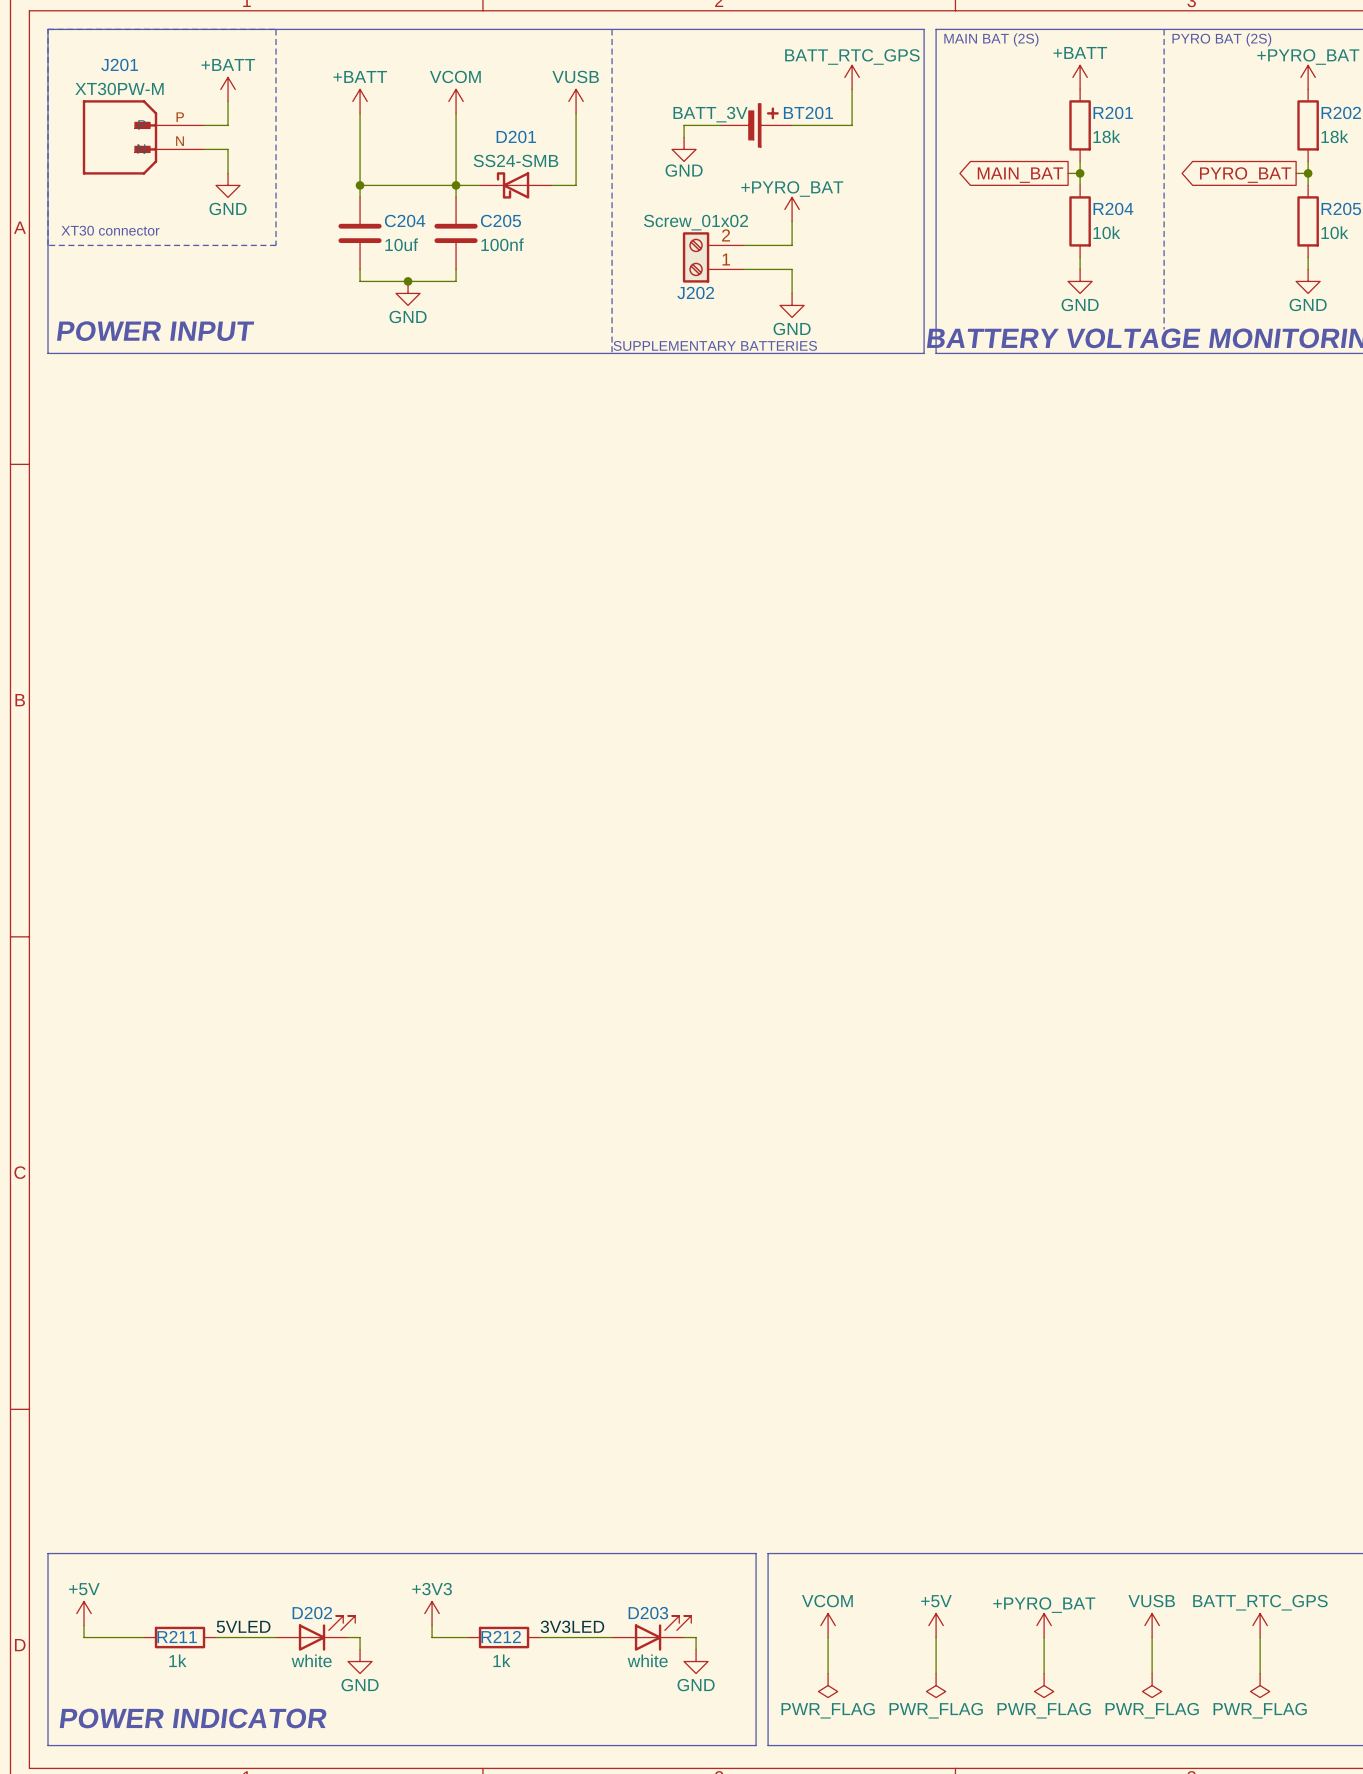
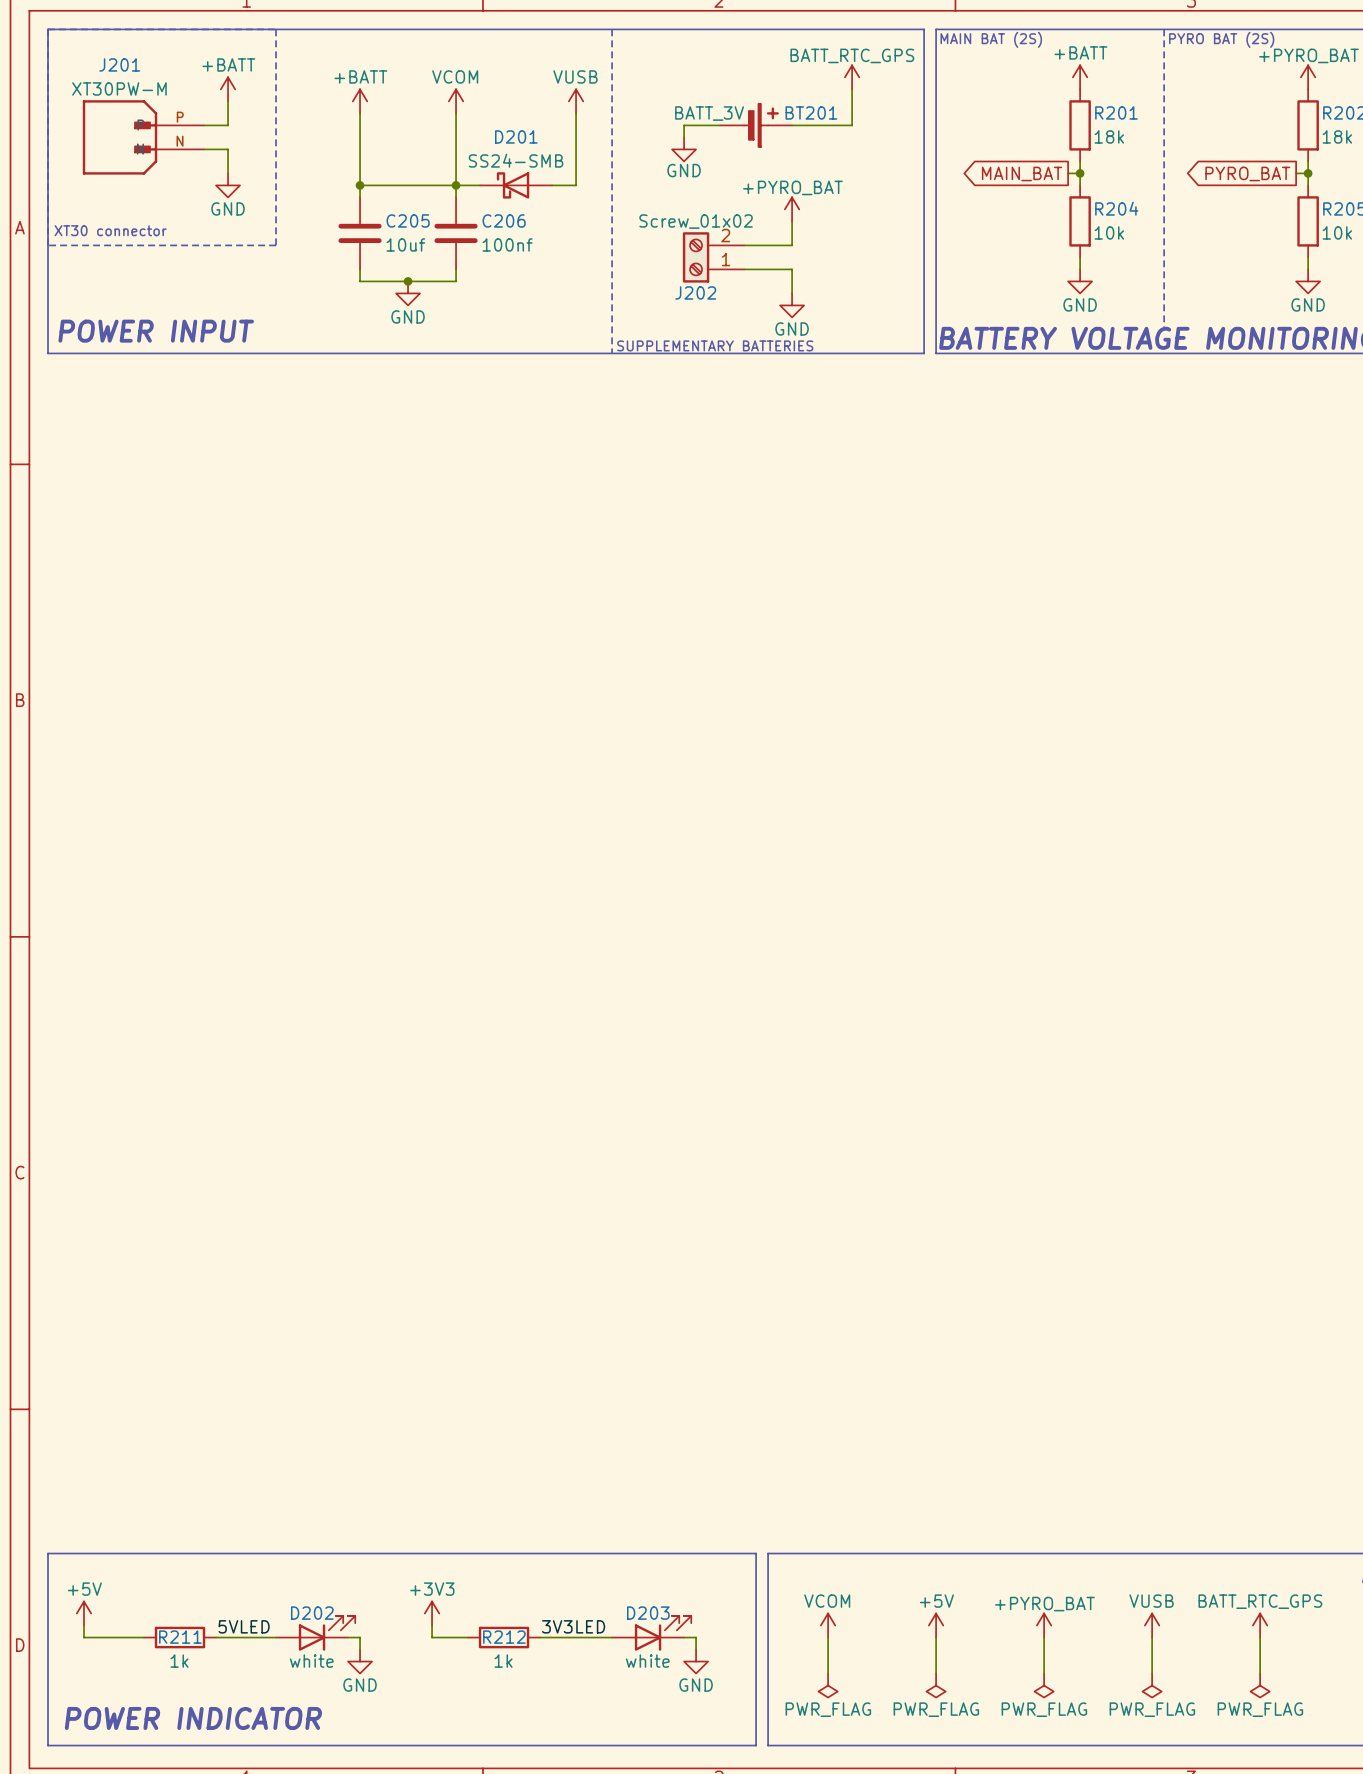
C204 name: C204 (405, 220) -> C205 (408, 220)
C205 name: C205 (500, 220) -> C206 (504, 220)

